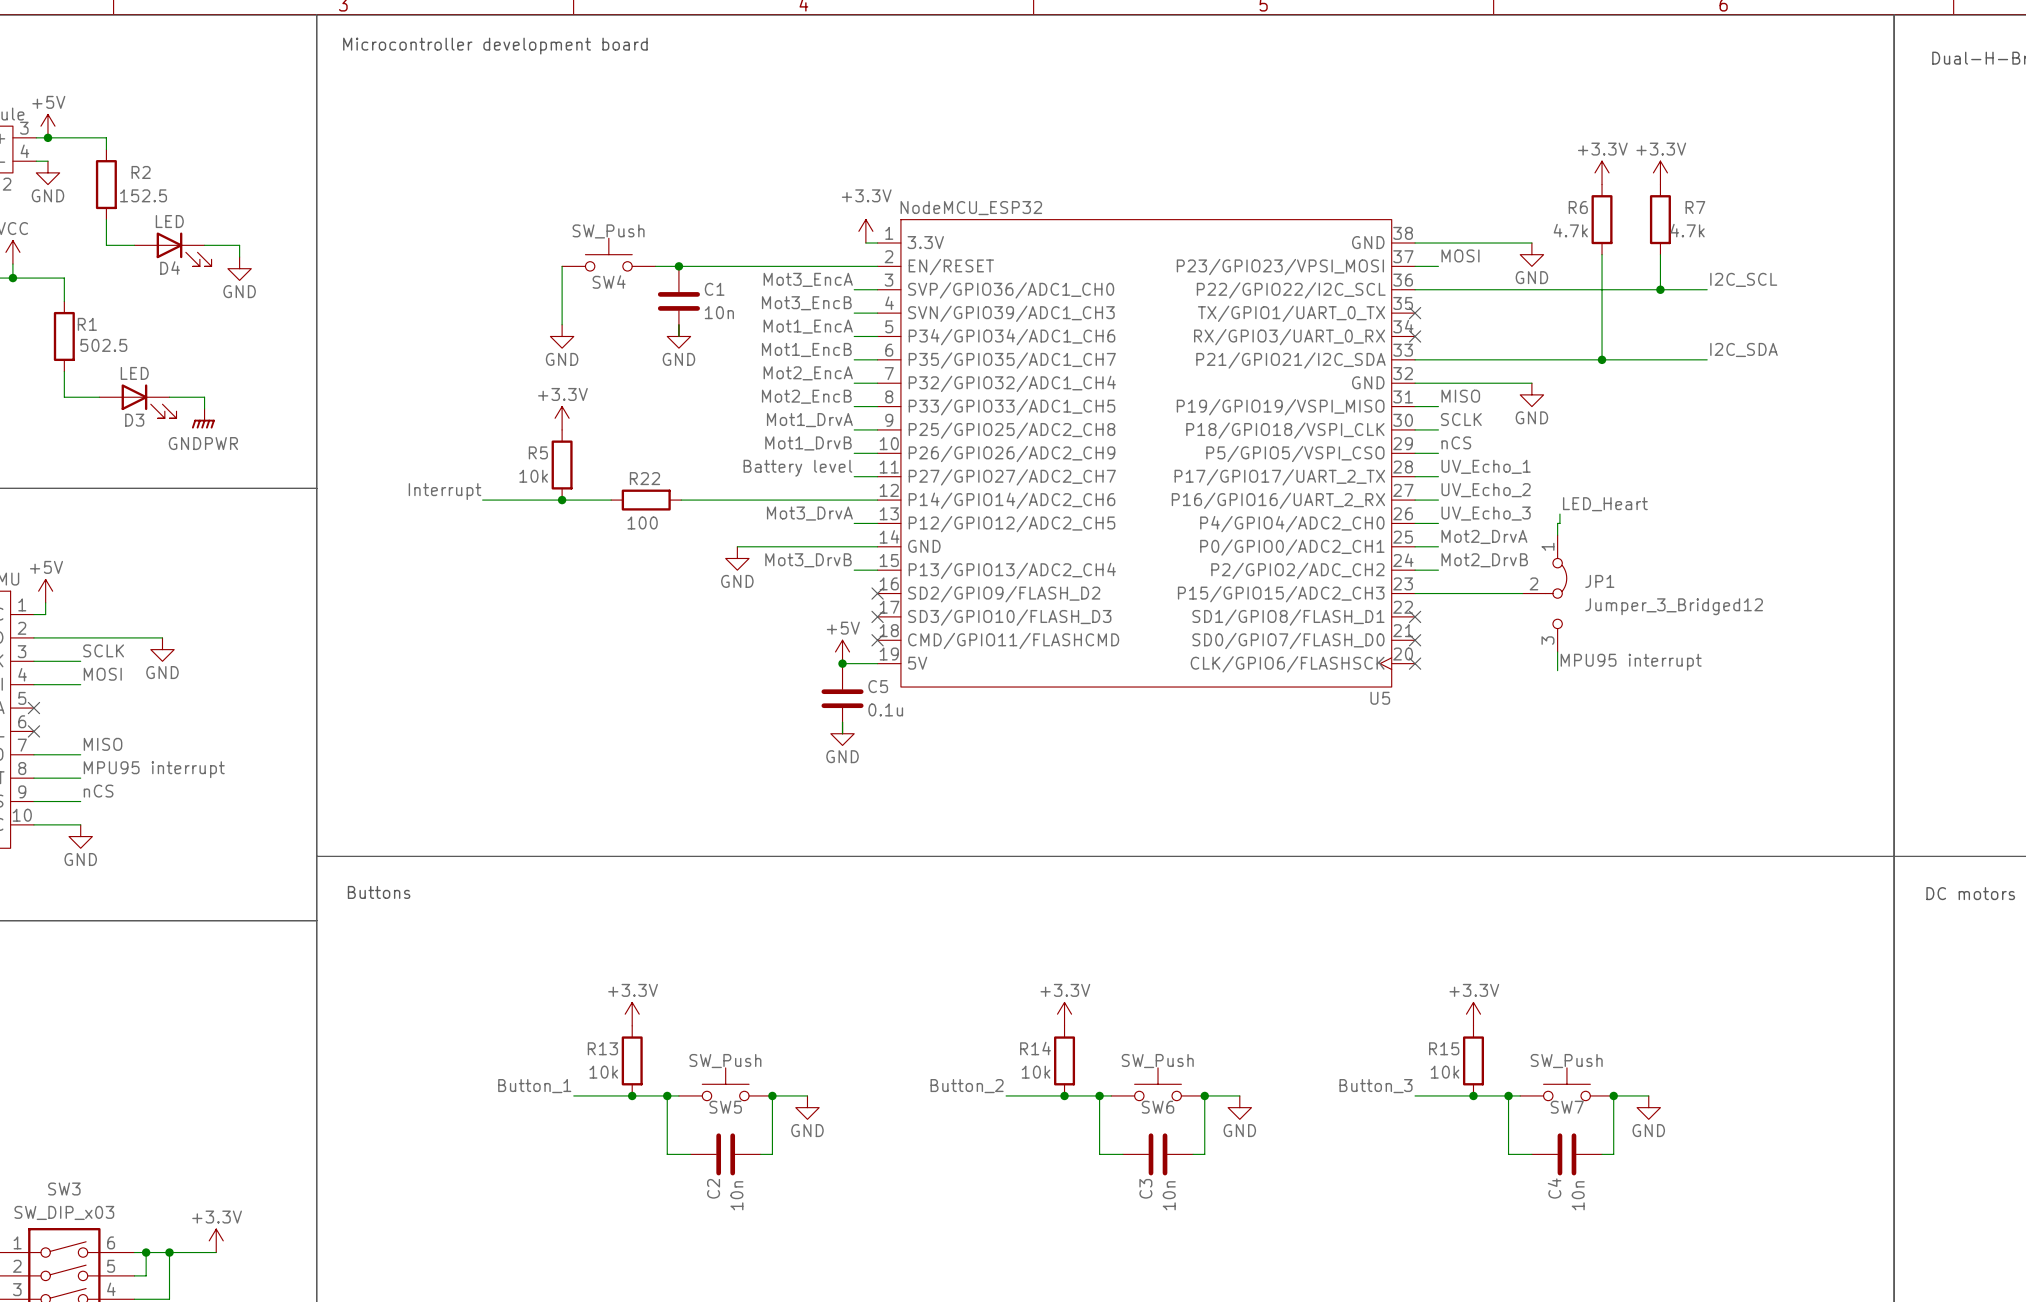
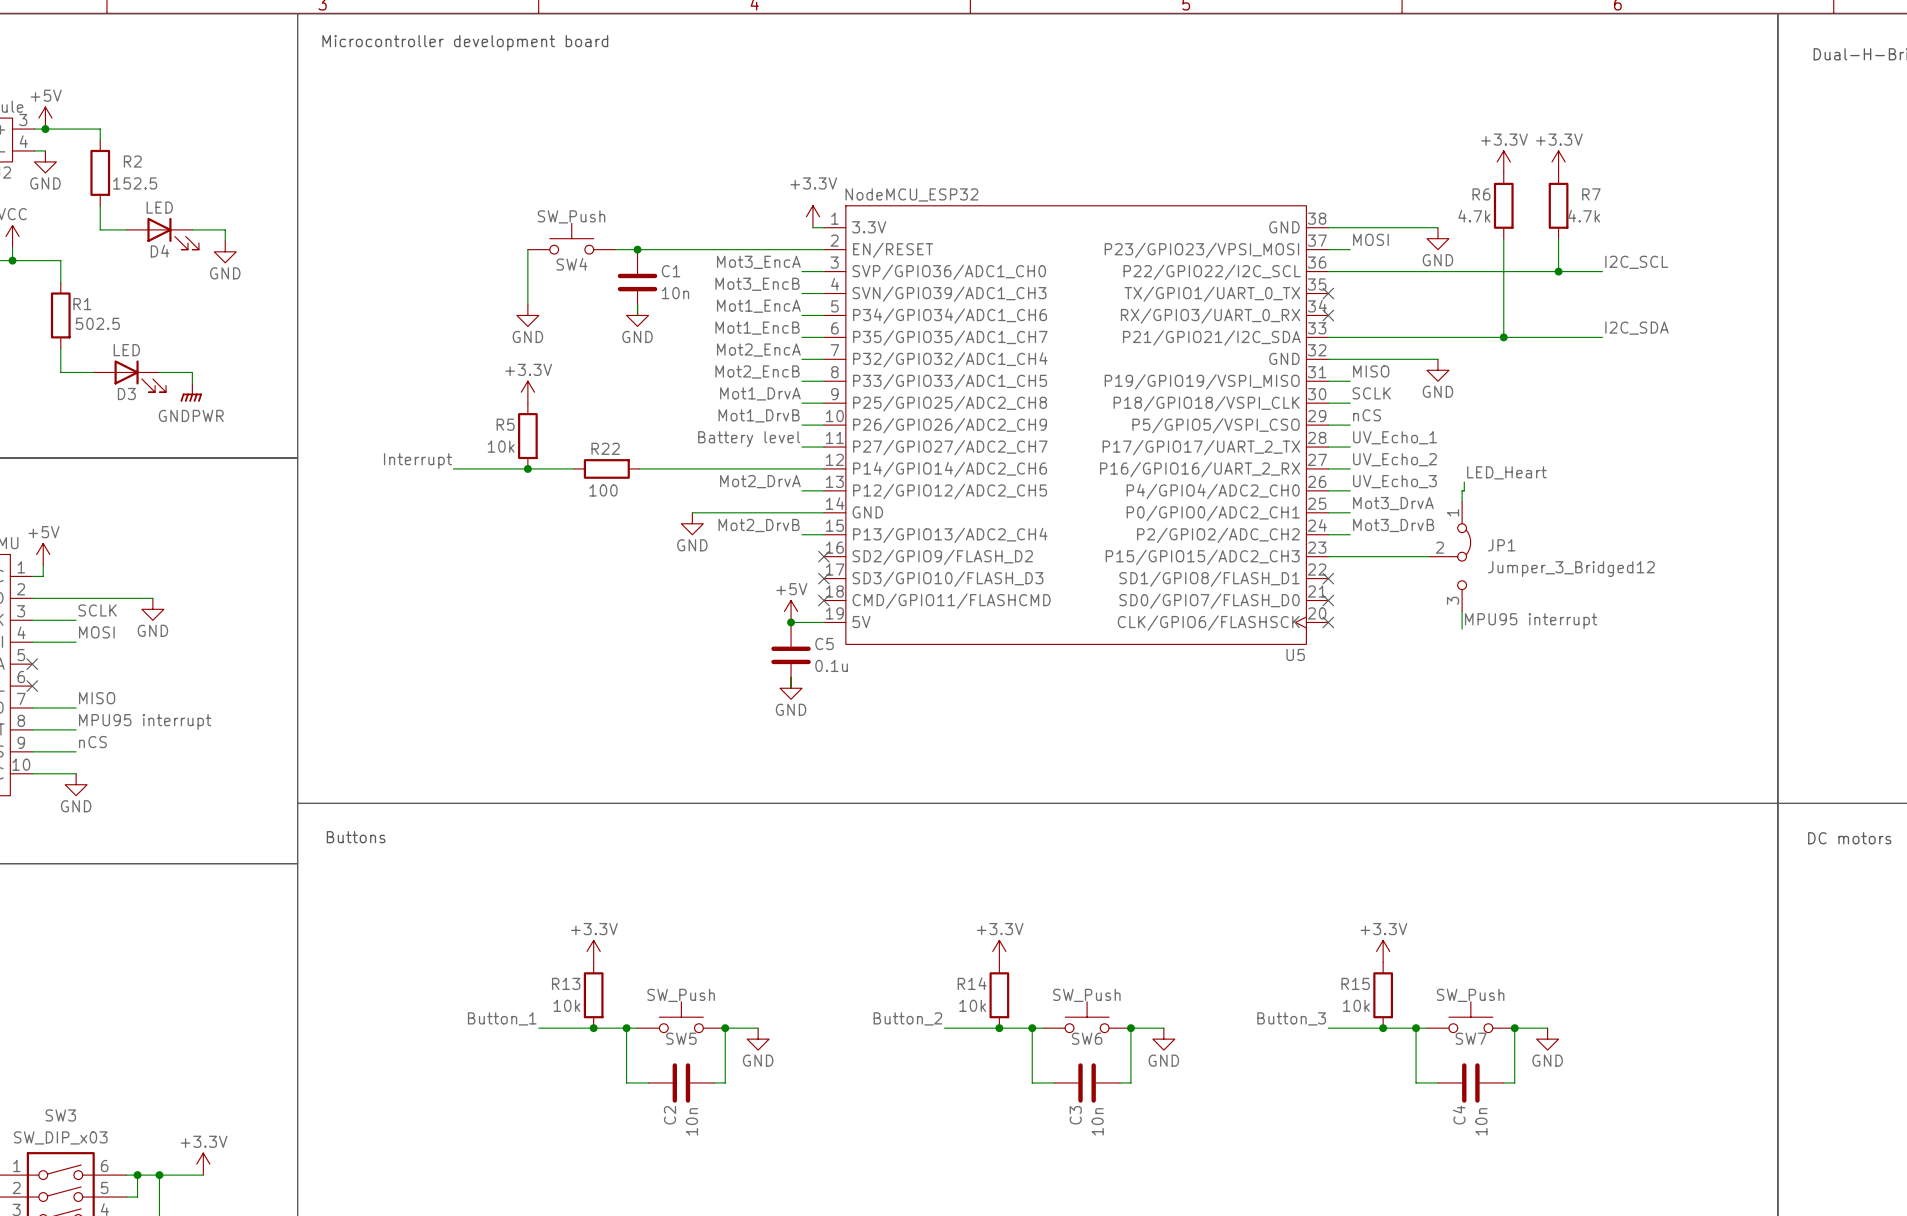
label: Mot3_DrvA (809, 513) -> Mot2_DrvA (760, 481)
label: Mot2_DrvA (1484, 536) -> Mot3_DrvA (1393, 503)
label: Mot3_DrvB (808, 560) -> Mot2_DrvB (759, 525)
label: Mot2_DrvB (1484, 560) -> Mot3_DrvB (1393, 525)

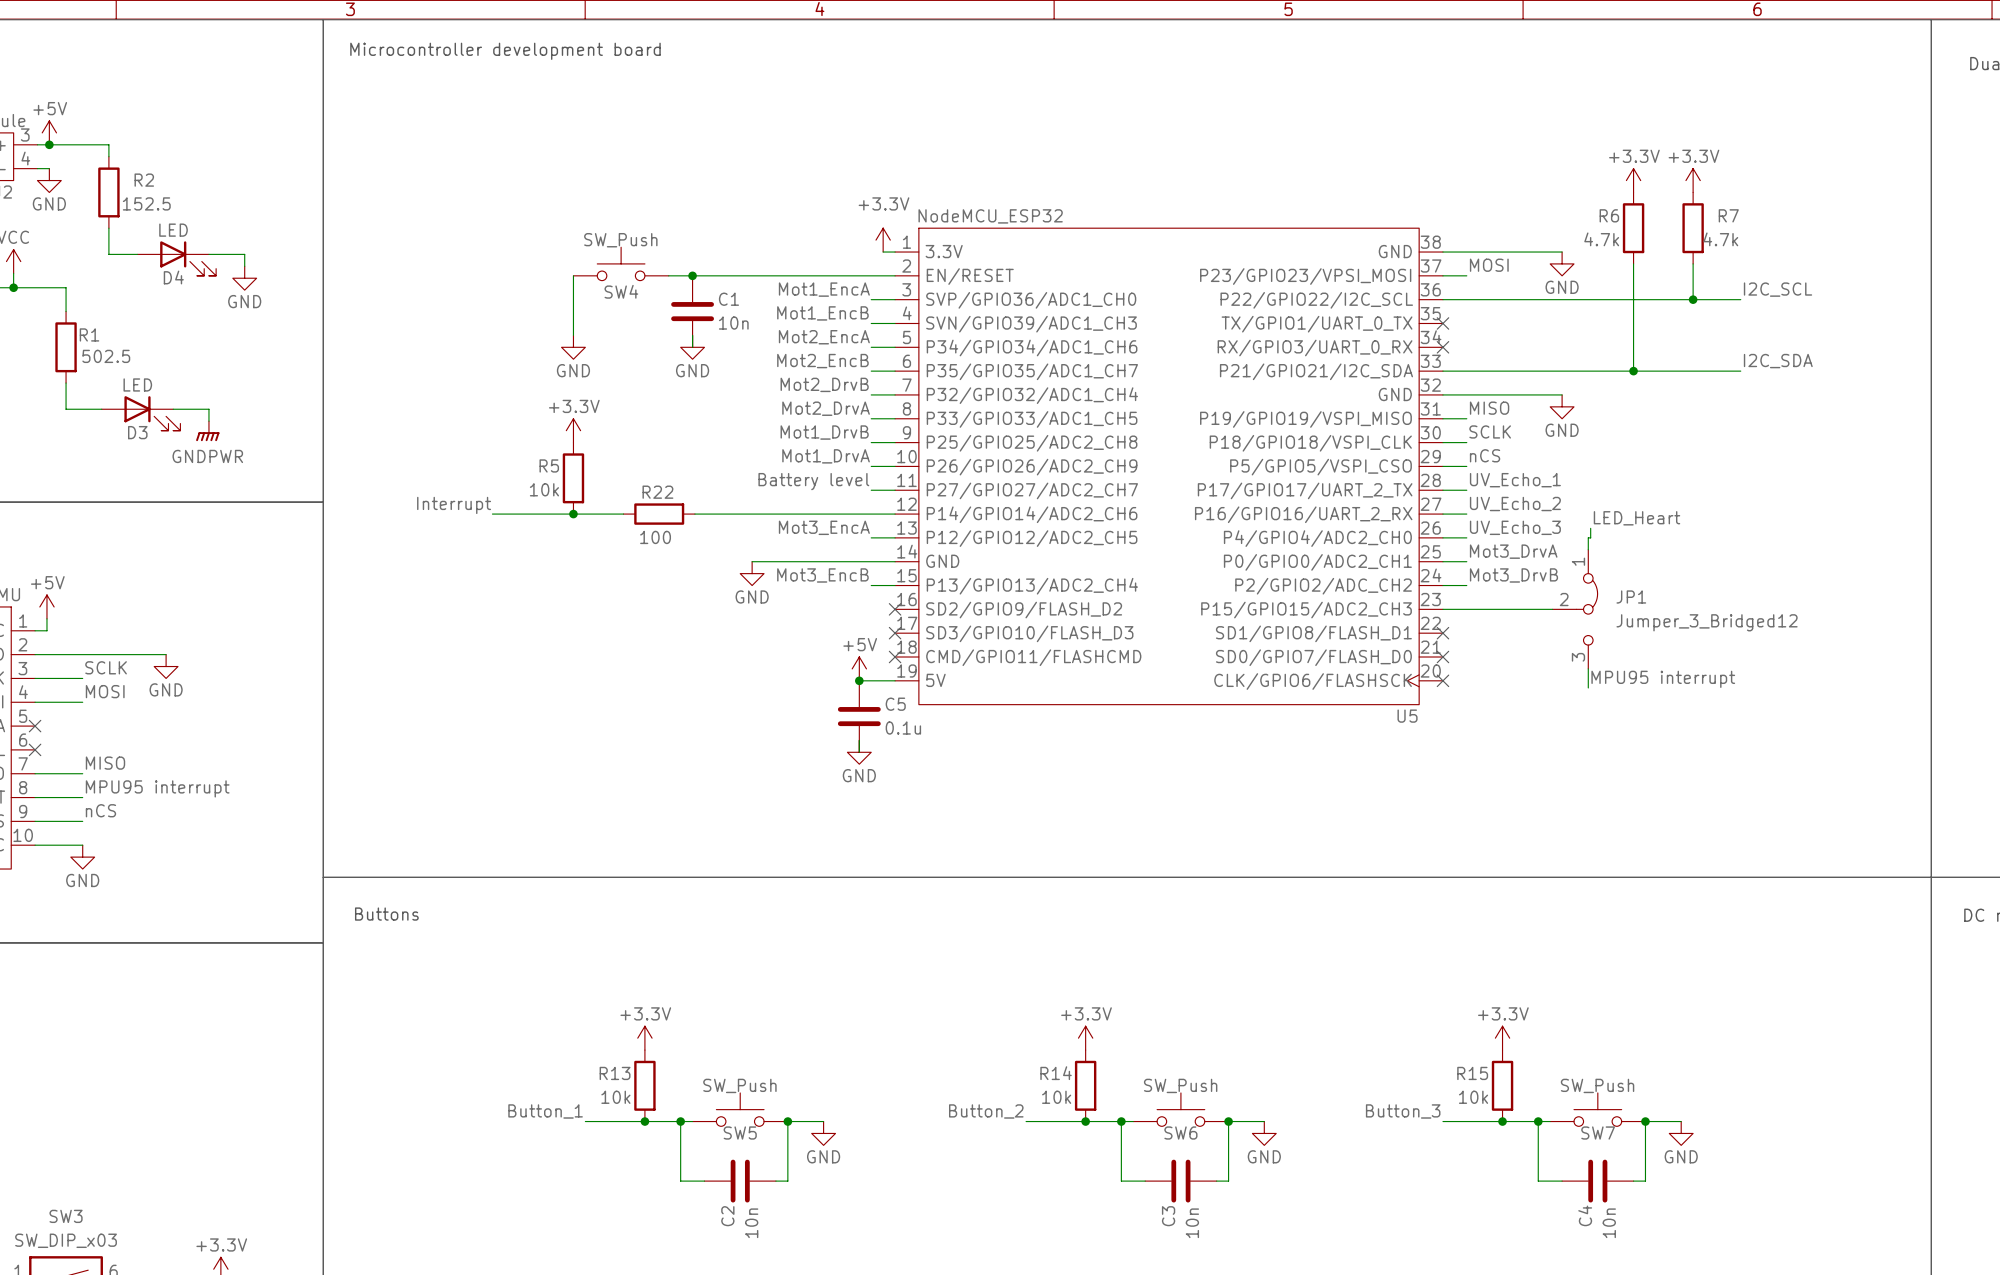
label: Mot3_EncA (758, 262) -> Mot1_EncA (824, 289)
label: Mot3_EncB (757, 284) -> Mot1_EncB (822, 313)
label: Mot1_EncA (758, 306) -> Mot2_EncA (824, 337)
label: Mot1_EncB (757, 328) -> Mot2_EncB (822, 361)
label: Mot2_EncA (758, 350) -> Mot2_DrvB (824, 384)
label: Mot2_EncB (757, 371) -> Mot2_DrvA (826, 408)
label: Mot1_DrvA (760, 393) -> Mot1_DrvB (824, 432)
label: Mot1_DrvB (759, 415) -> Mot1_DrvA (826, 456)
label: Mot2_DrvA (760, 481) -> Mot3_EncA (824, 527)
label: Mot2_DrvB (759, 525) -> Mot3_EncB (822, 575)

